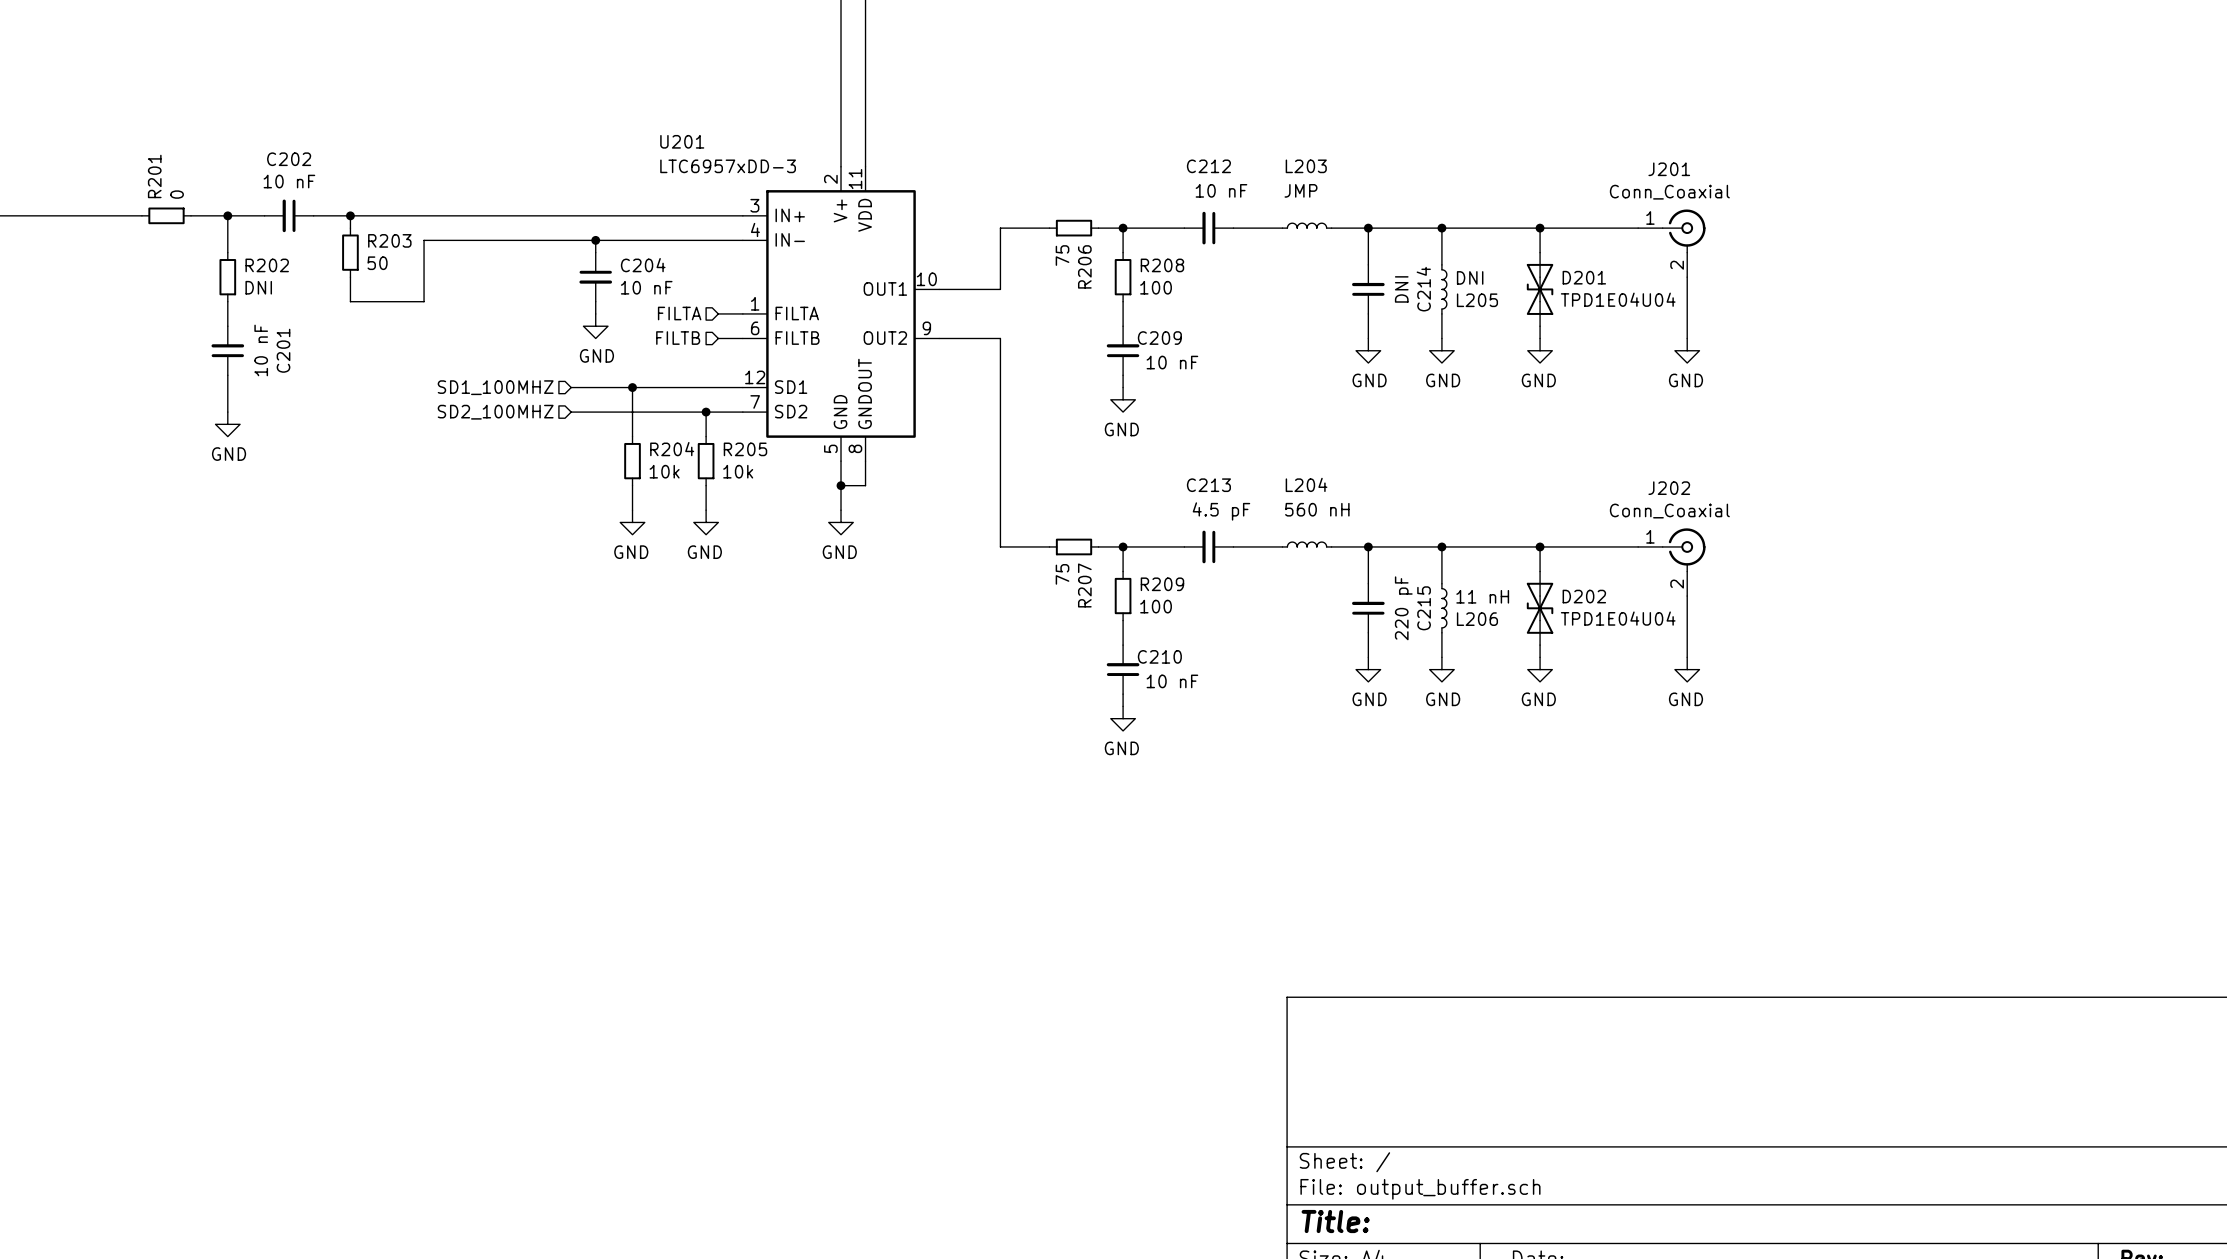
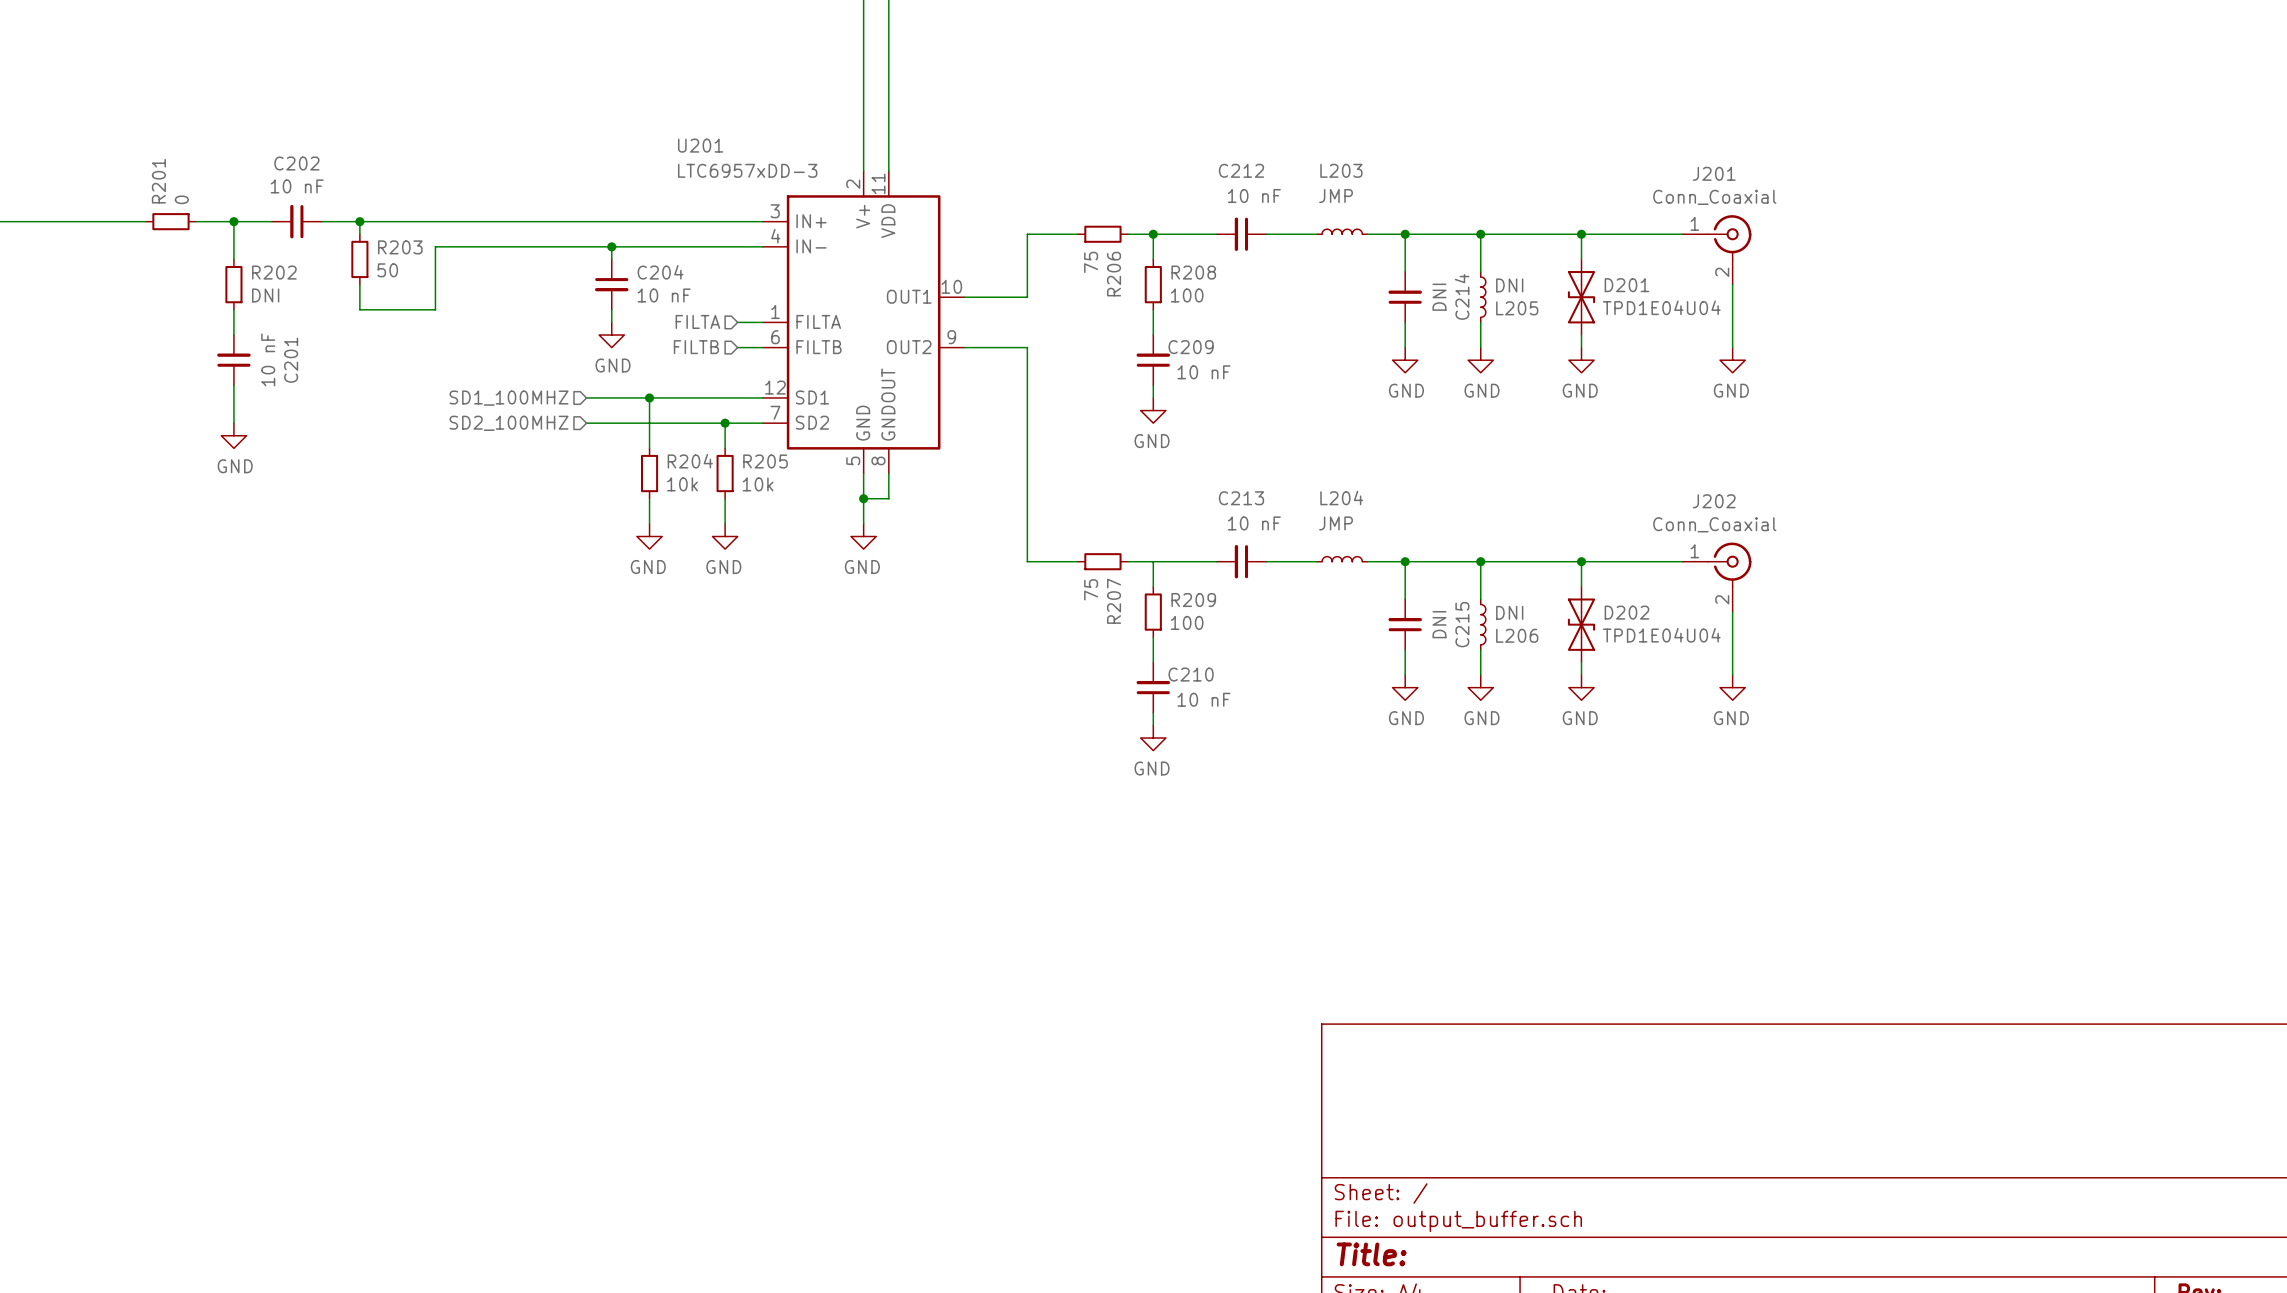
L204 value: 560 nH (1317, 509) -> JMP (1336, 523)
C213 value: 4.5 pF (1221, 511) -> 10 nF (1254, 523)
junction: (1123, 546) -> none
L206 value: 11 nH (1482, 596) -> DNI (1509, 612)
C215 value: 220 pF (1403, 608) -> DNI (1439, 624)

